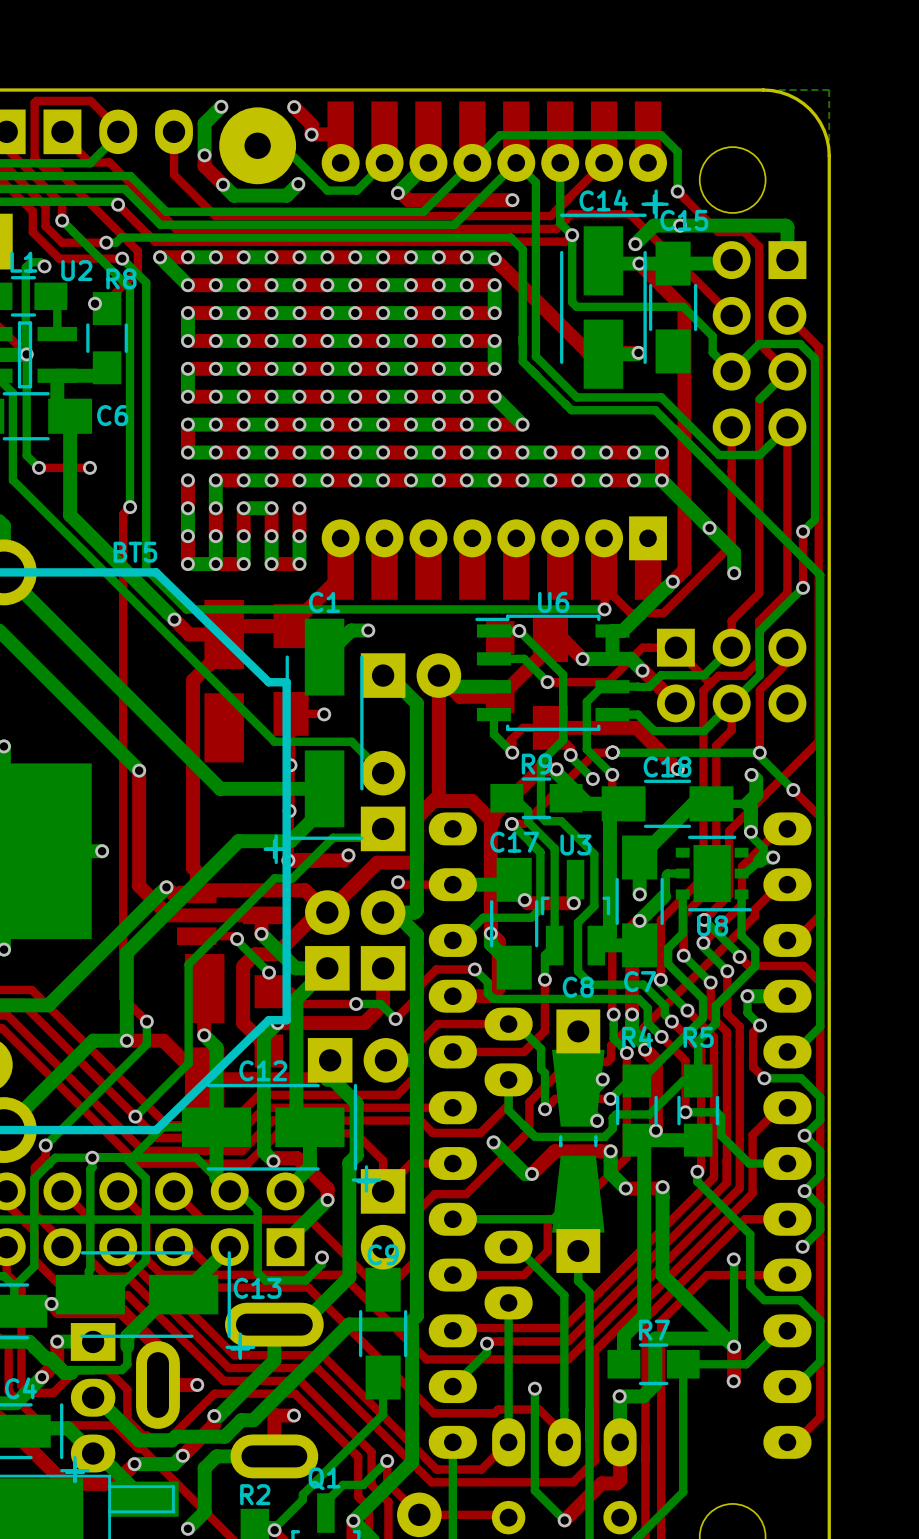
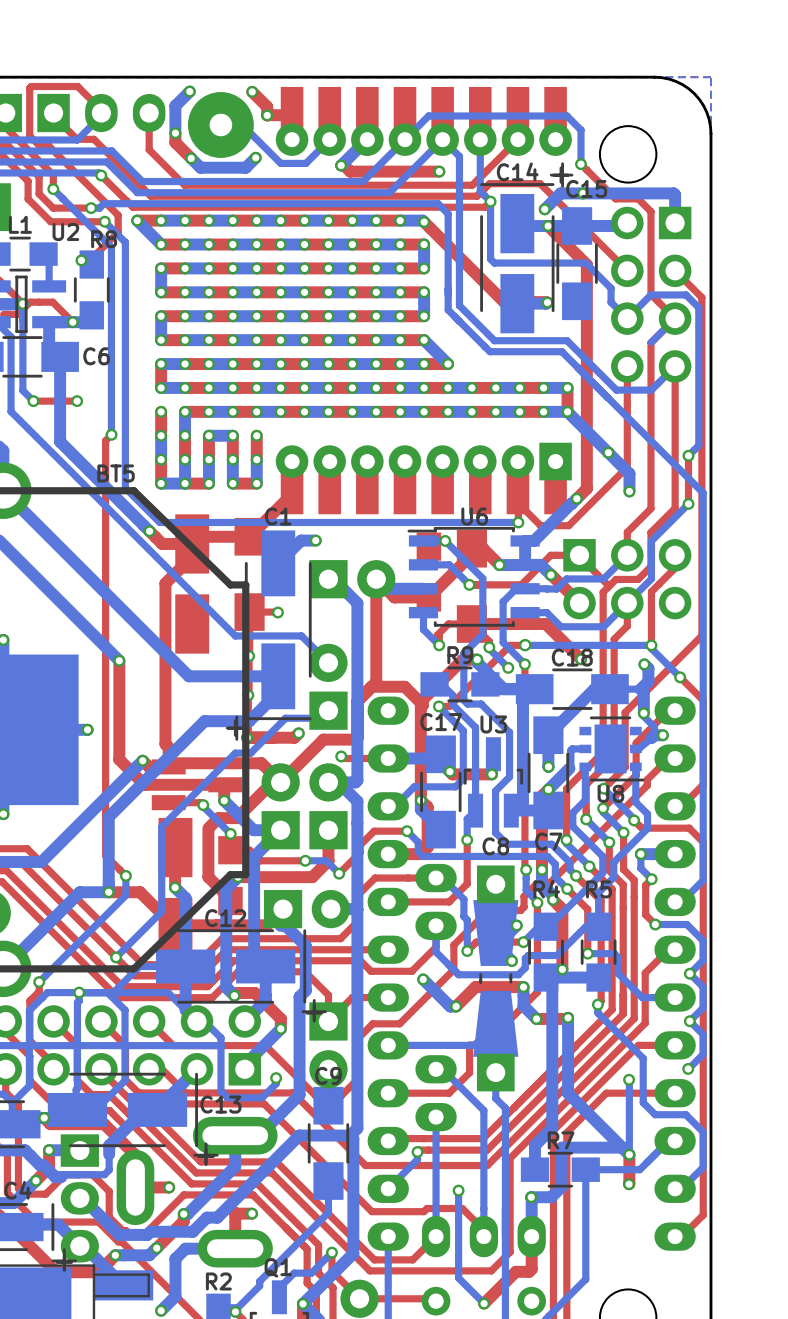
bottom track: (44, 266) (40, 262) (31, 262) (25, 267) (26, 360) -> none
via: (44, 266) -> none
top track: none -> (3, 314) (17, 314) (30, 302) (52, 302) (72, 322)
via: none -> (72, 322)

